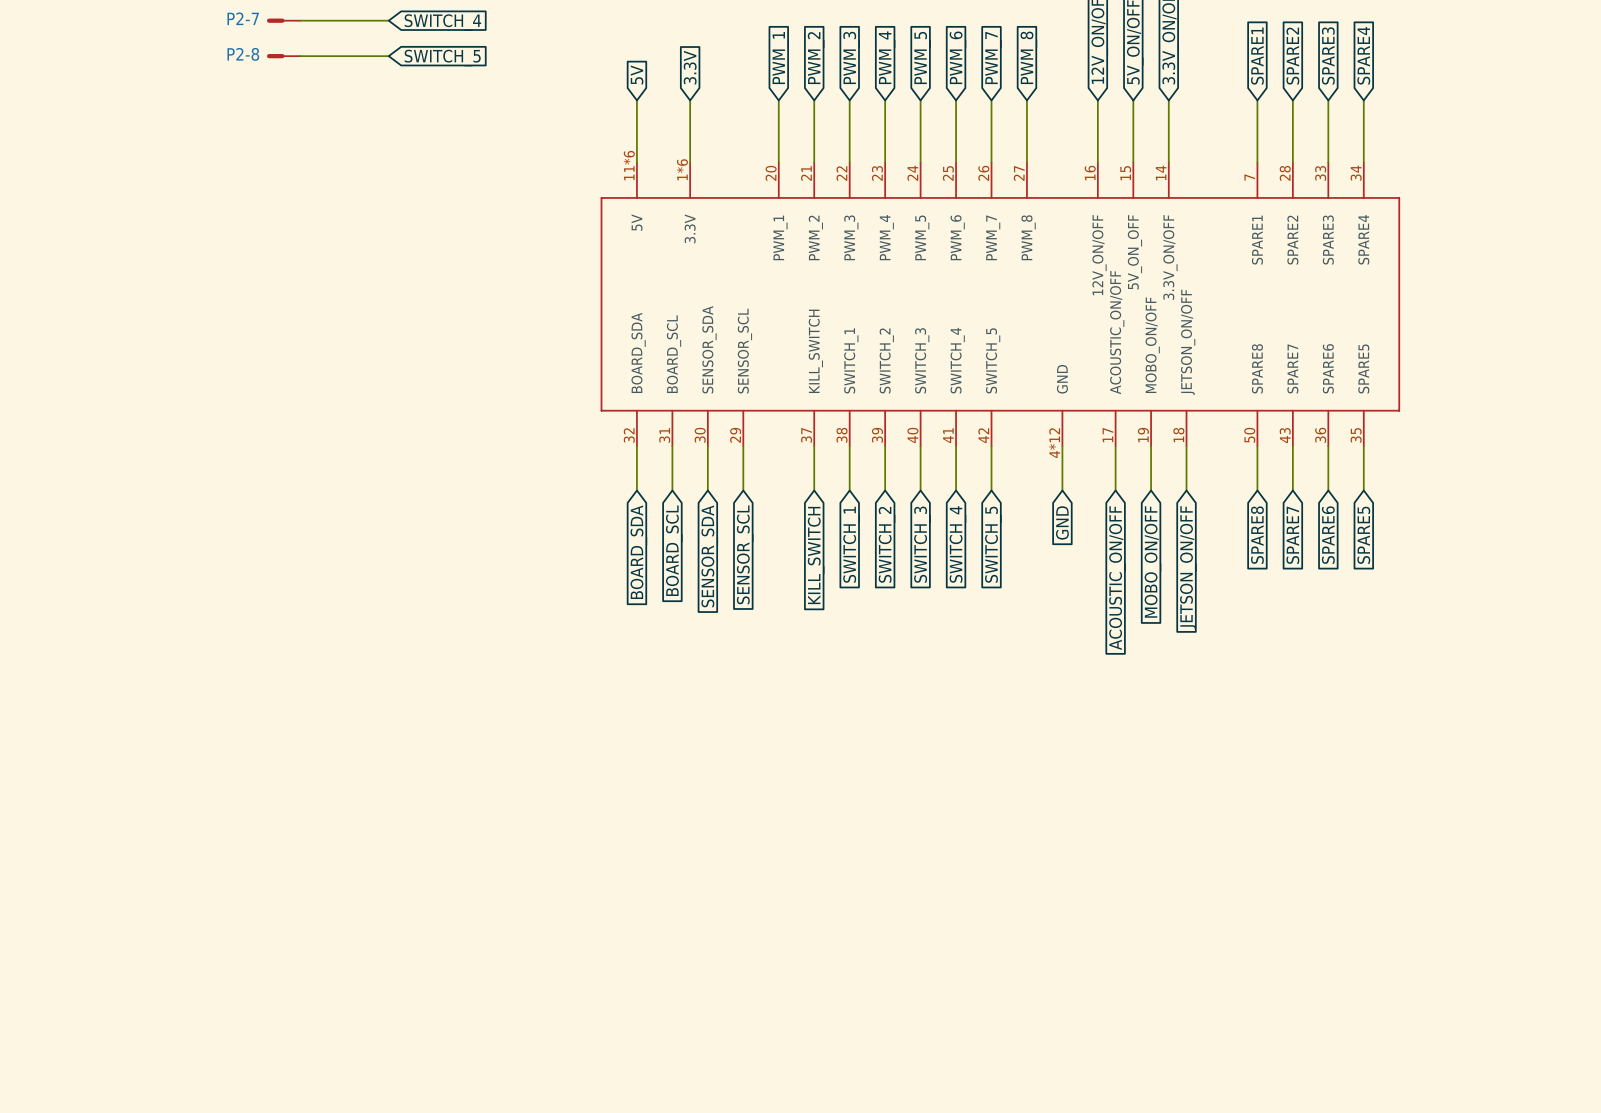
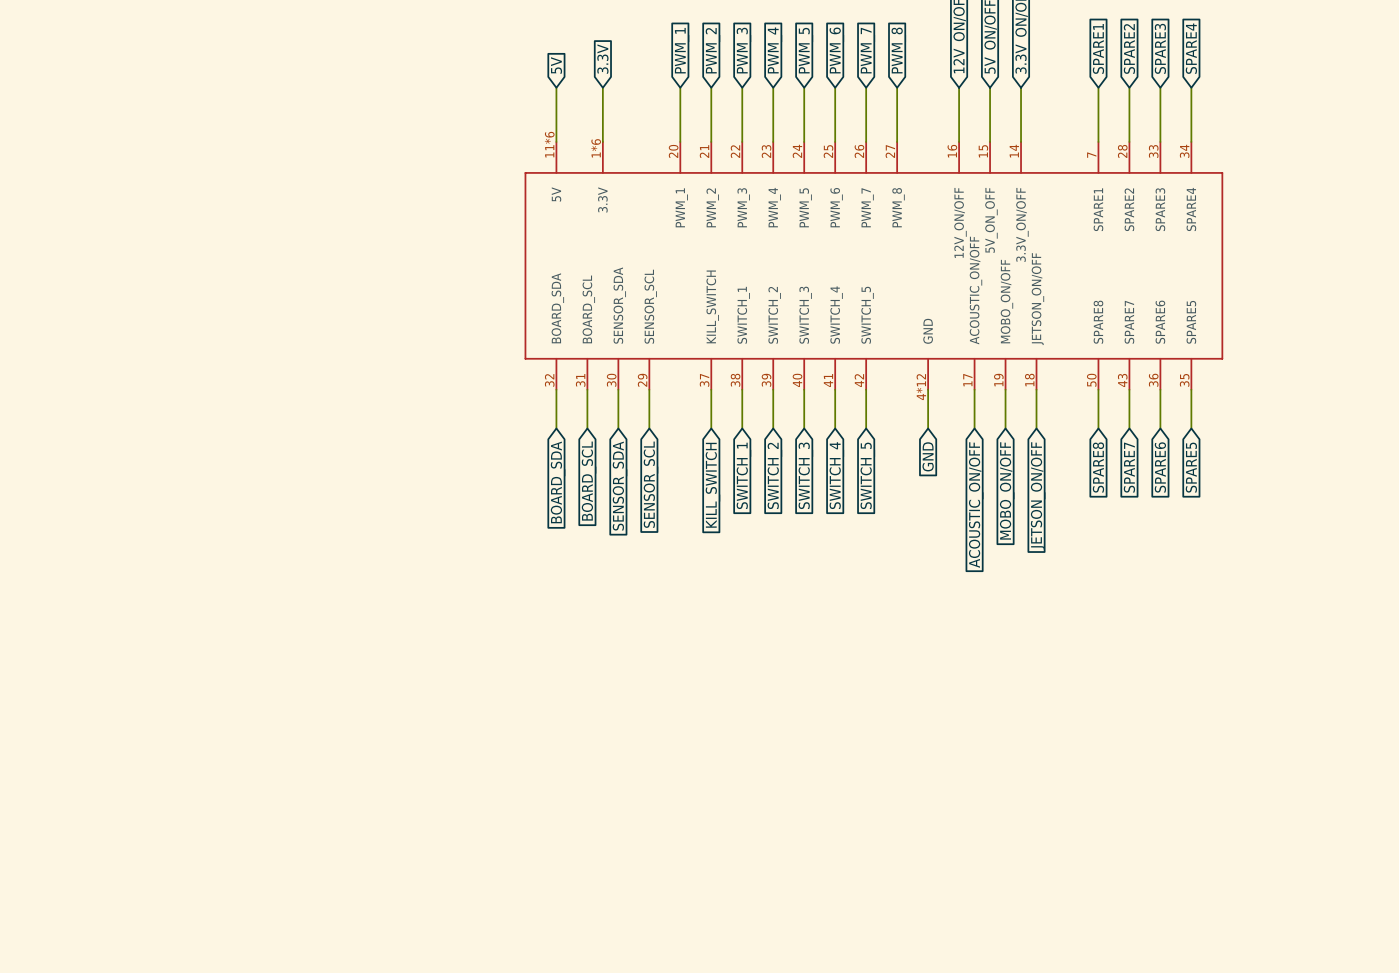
P2-7: (283, 20) -> none
wire: (300, 20) (388, 20) -> none
global label: SWITCH_4 (442, 22) -> none
P2-8: (283, 56) -> none
wire: (300, 56) (388, 56) -> none
global label: SWITCH_5 (442, 58) -> none

